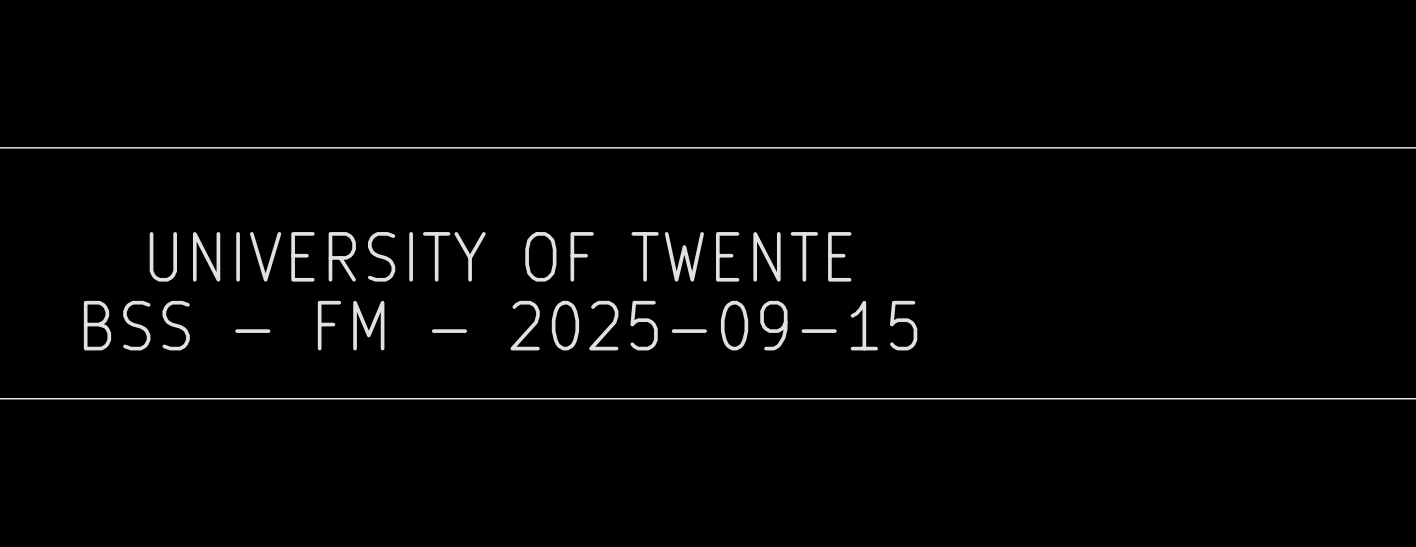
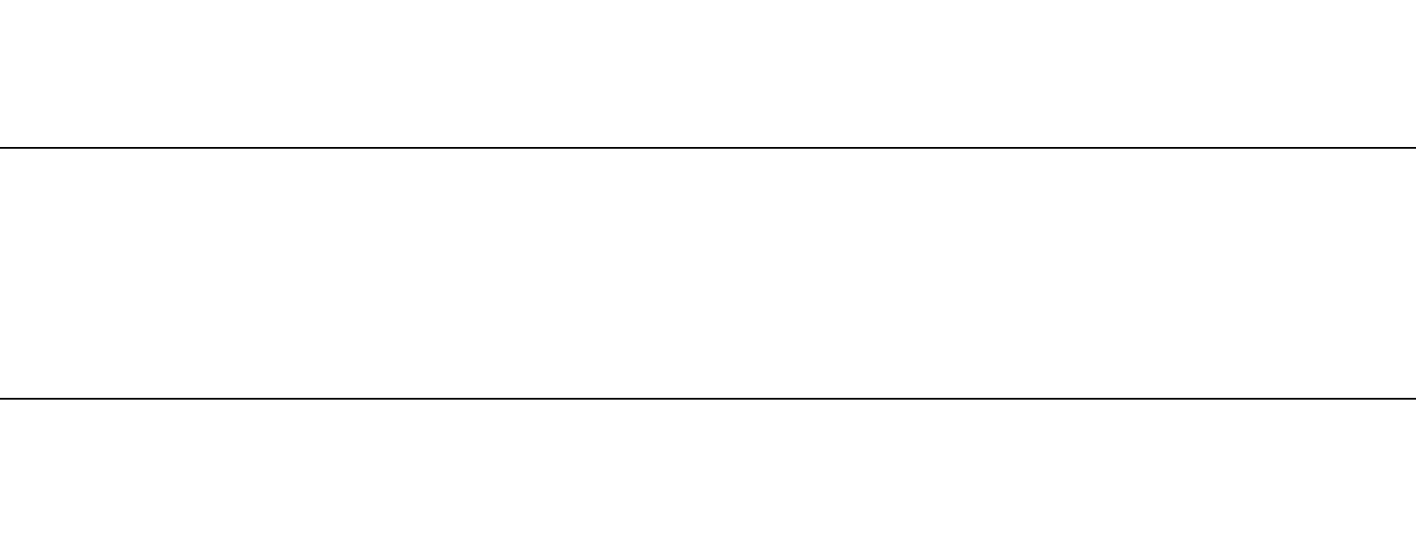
text: UNIVERSITY OF TWENTE (500, 256) -> none
text: BSS - FM - 2025-09-15 (500, 325) -> none

